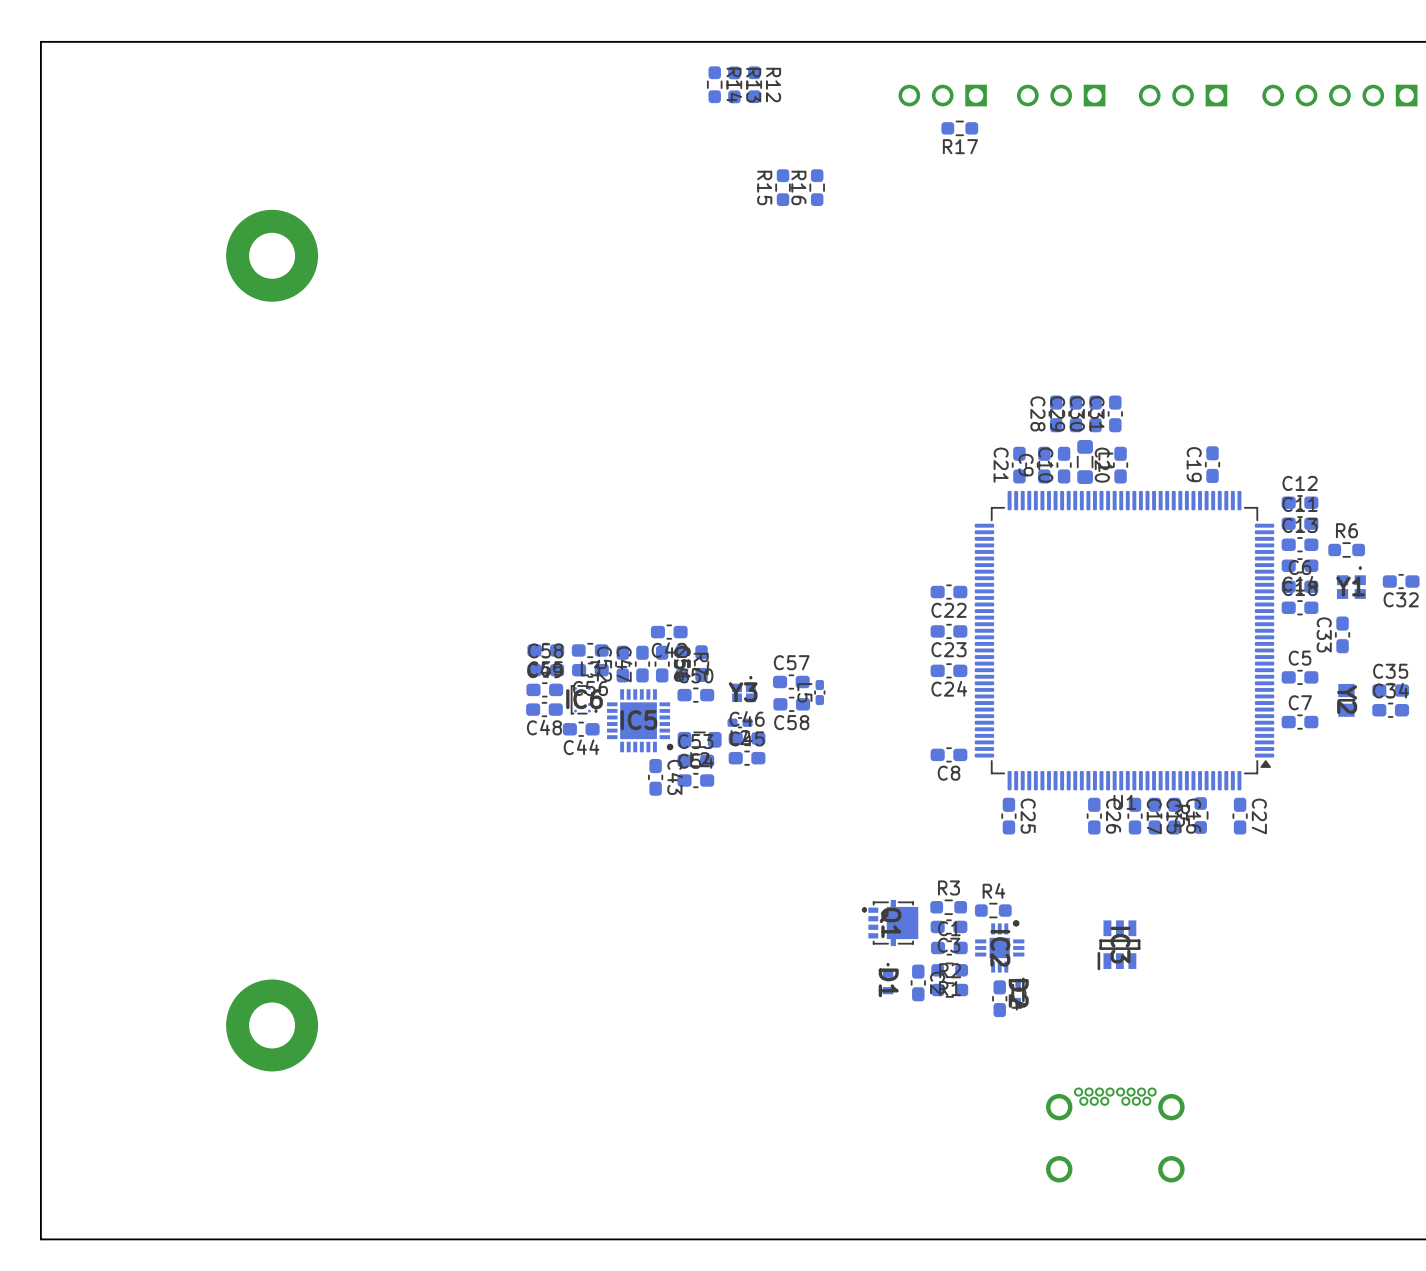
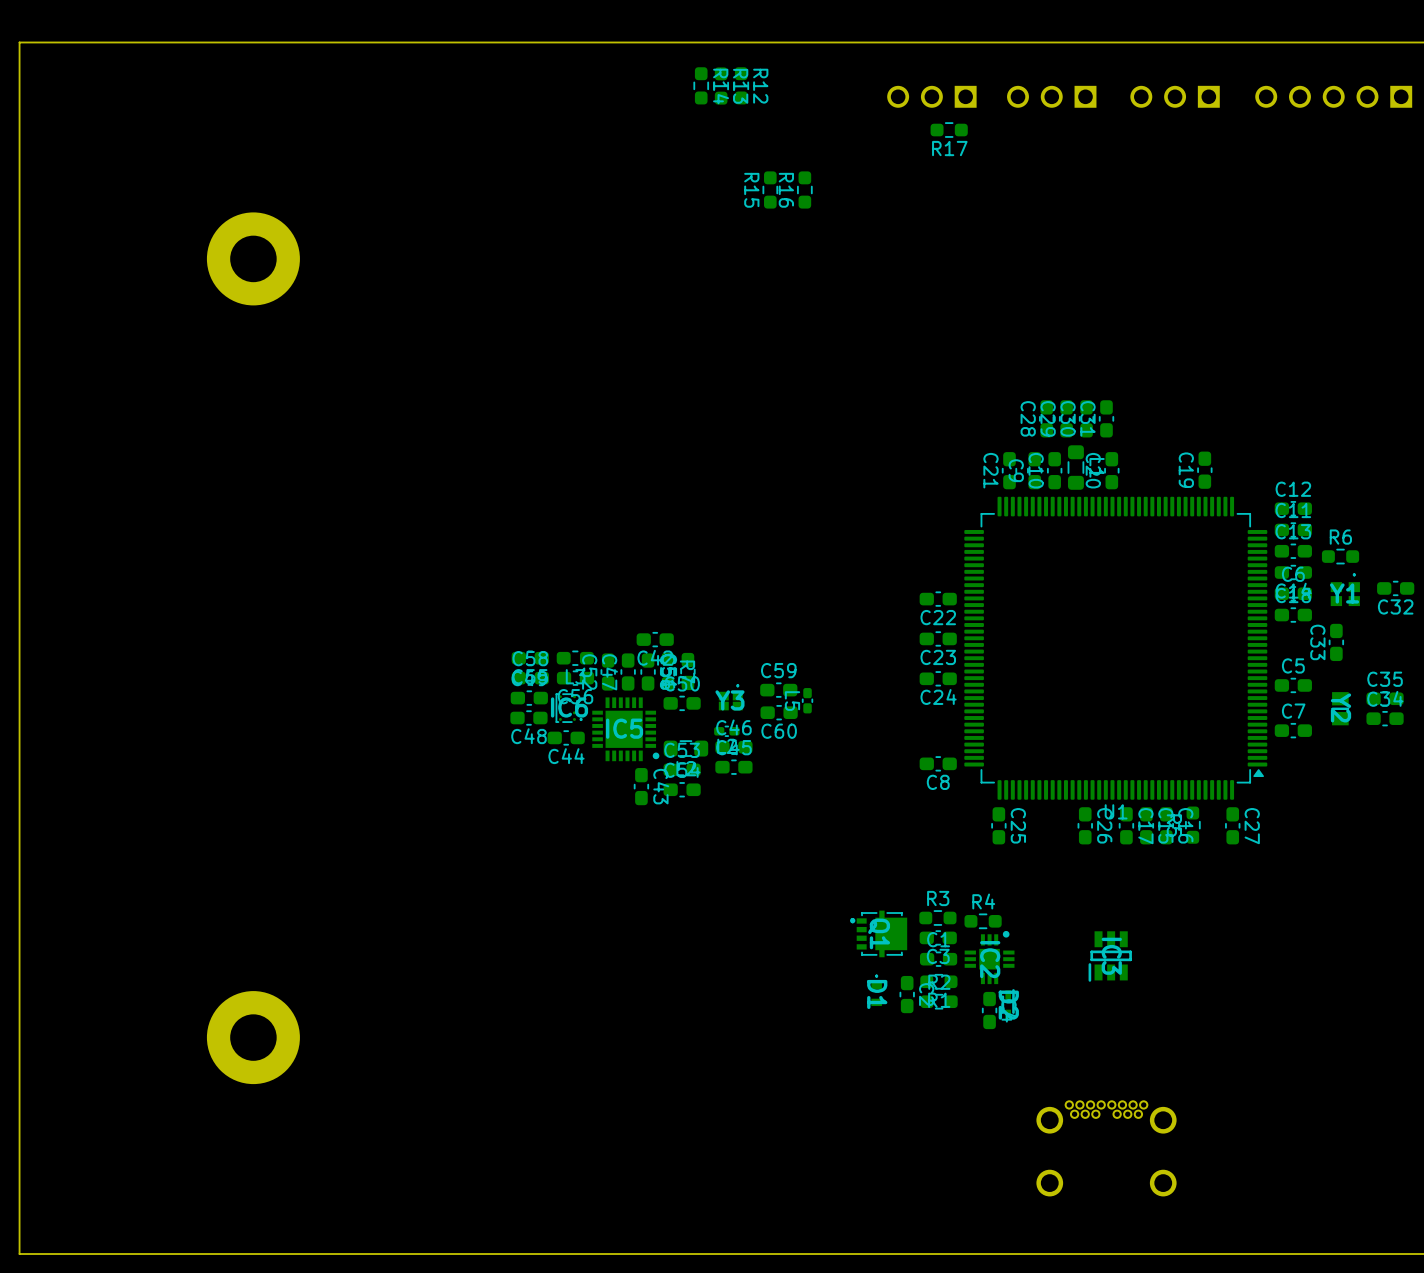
C57 name: C57 (791, 662) -> C59 (778, 670)
C58 name: C58 (791, 722) -> C60 (779, 731)

